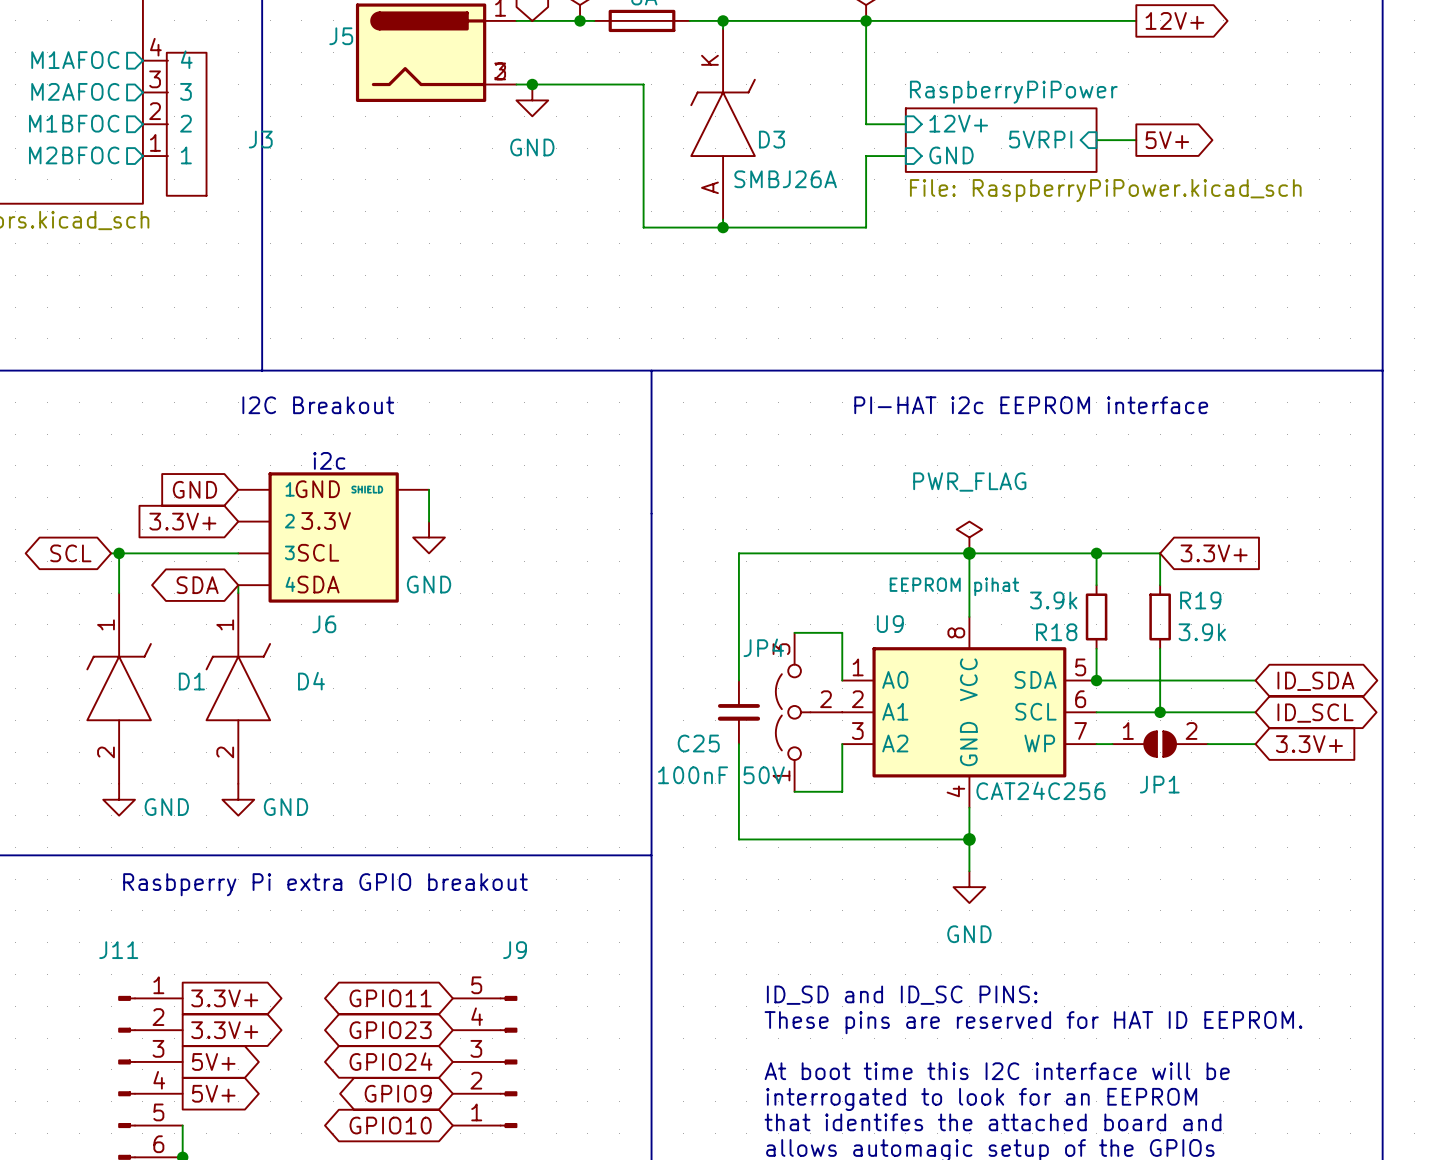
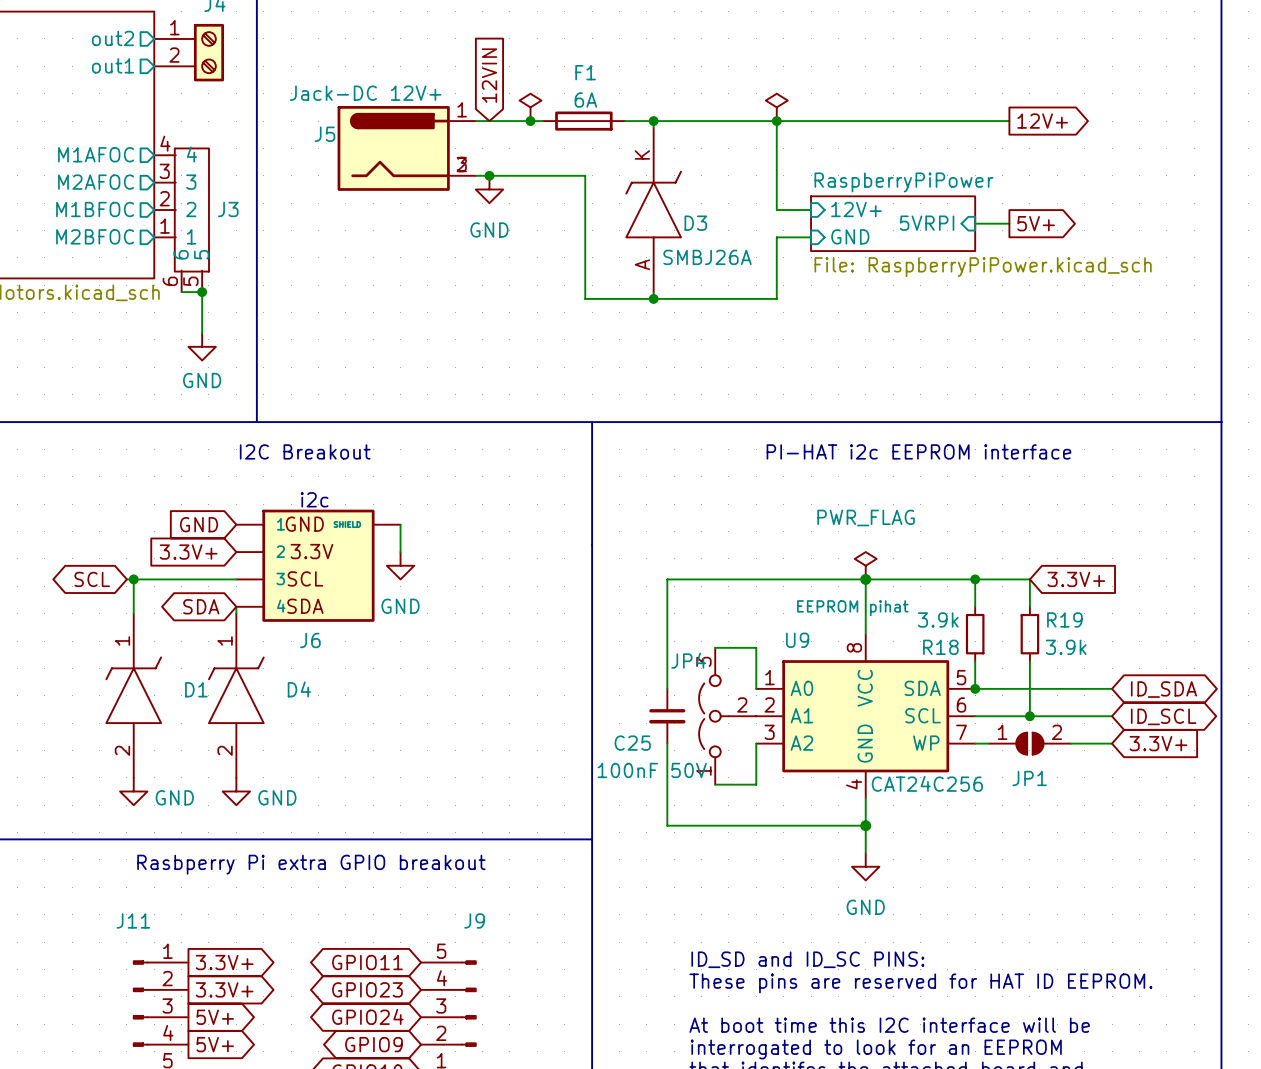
J3 symbol: [142, 52, 207, 196] -> [154, 148, 209, 293]
J3 name position: J3 (260, 139) -> J3 (228, 209)
wire: none -> (181, 292) (202, 292) (202, 333)
junction: none -> (202, 292)
power symbol: none -> GND (202, 346)

